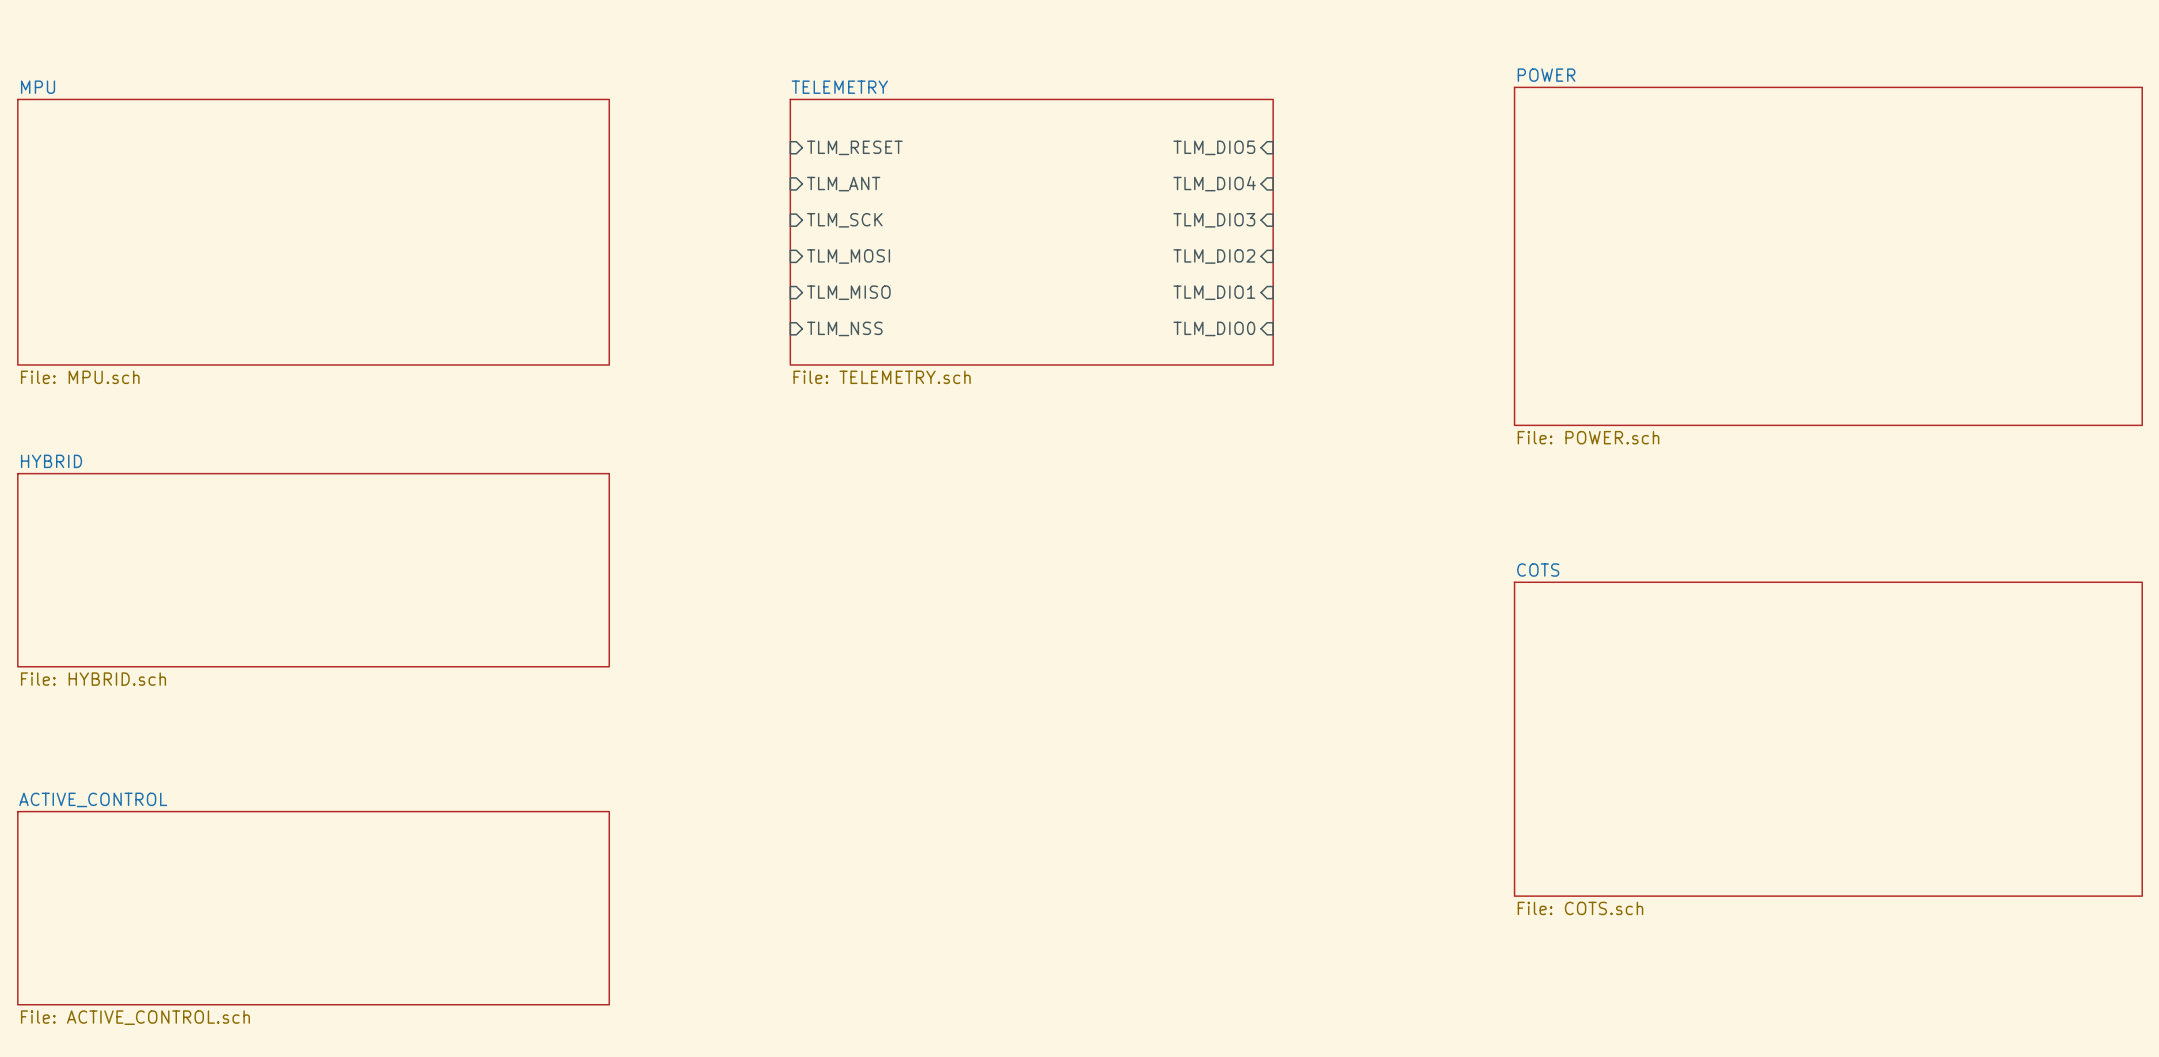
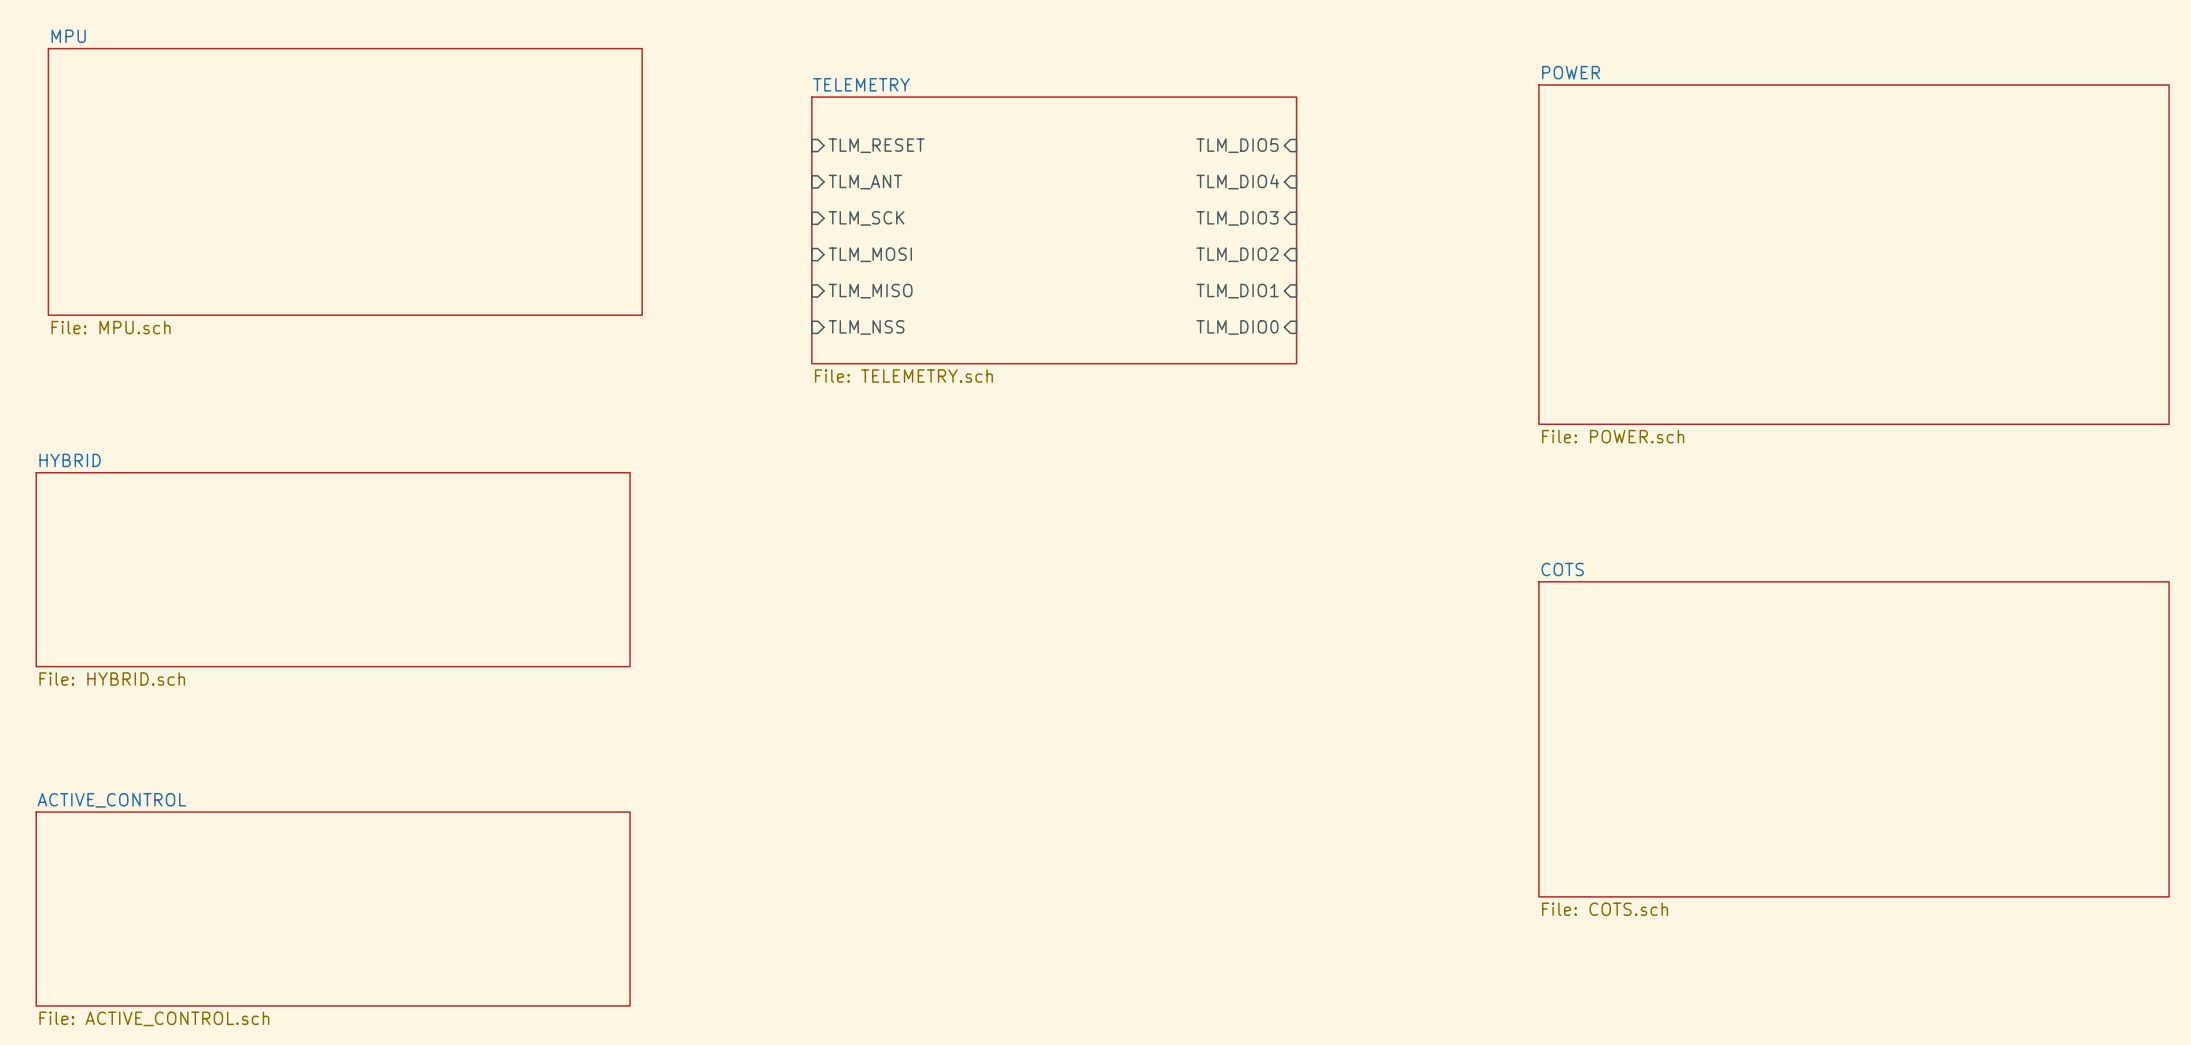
sheet MPU position: (313, 232) -> (345, 181)

